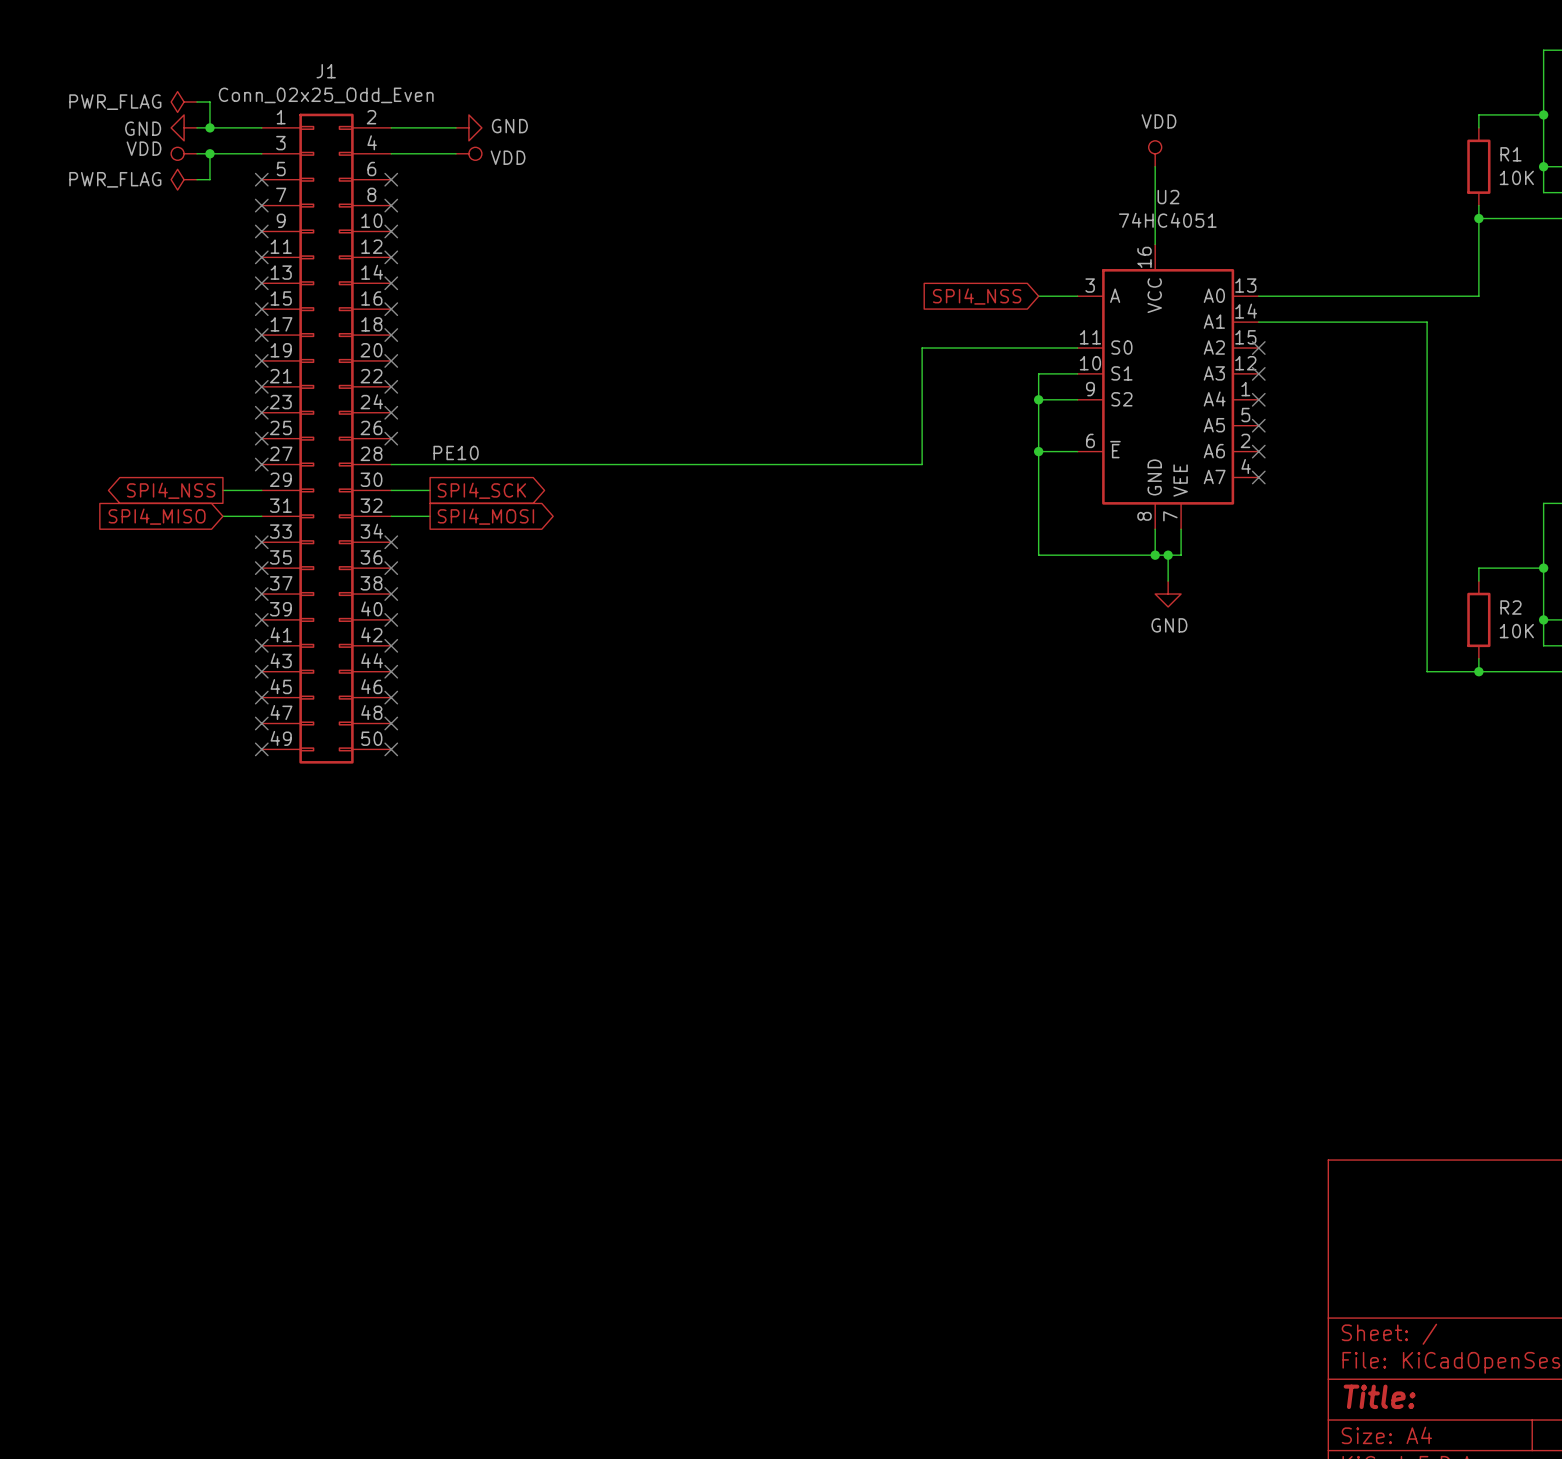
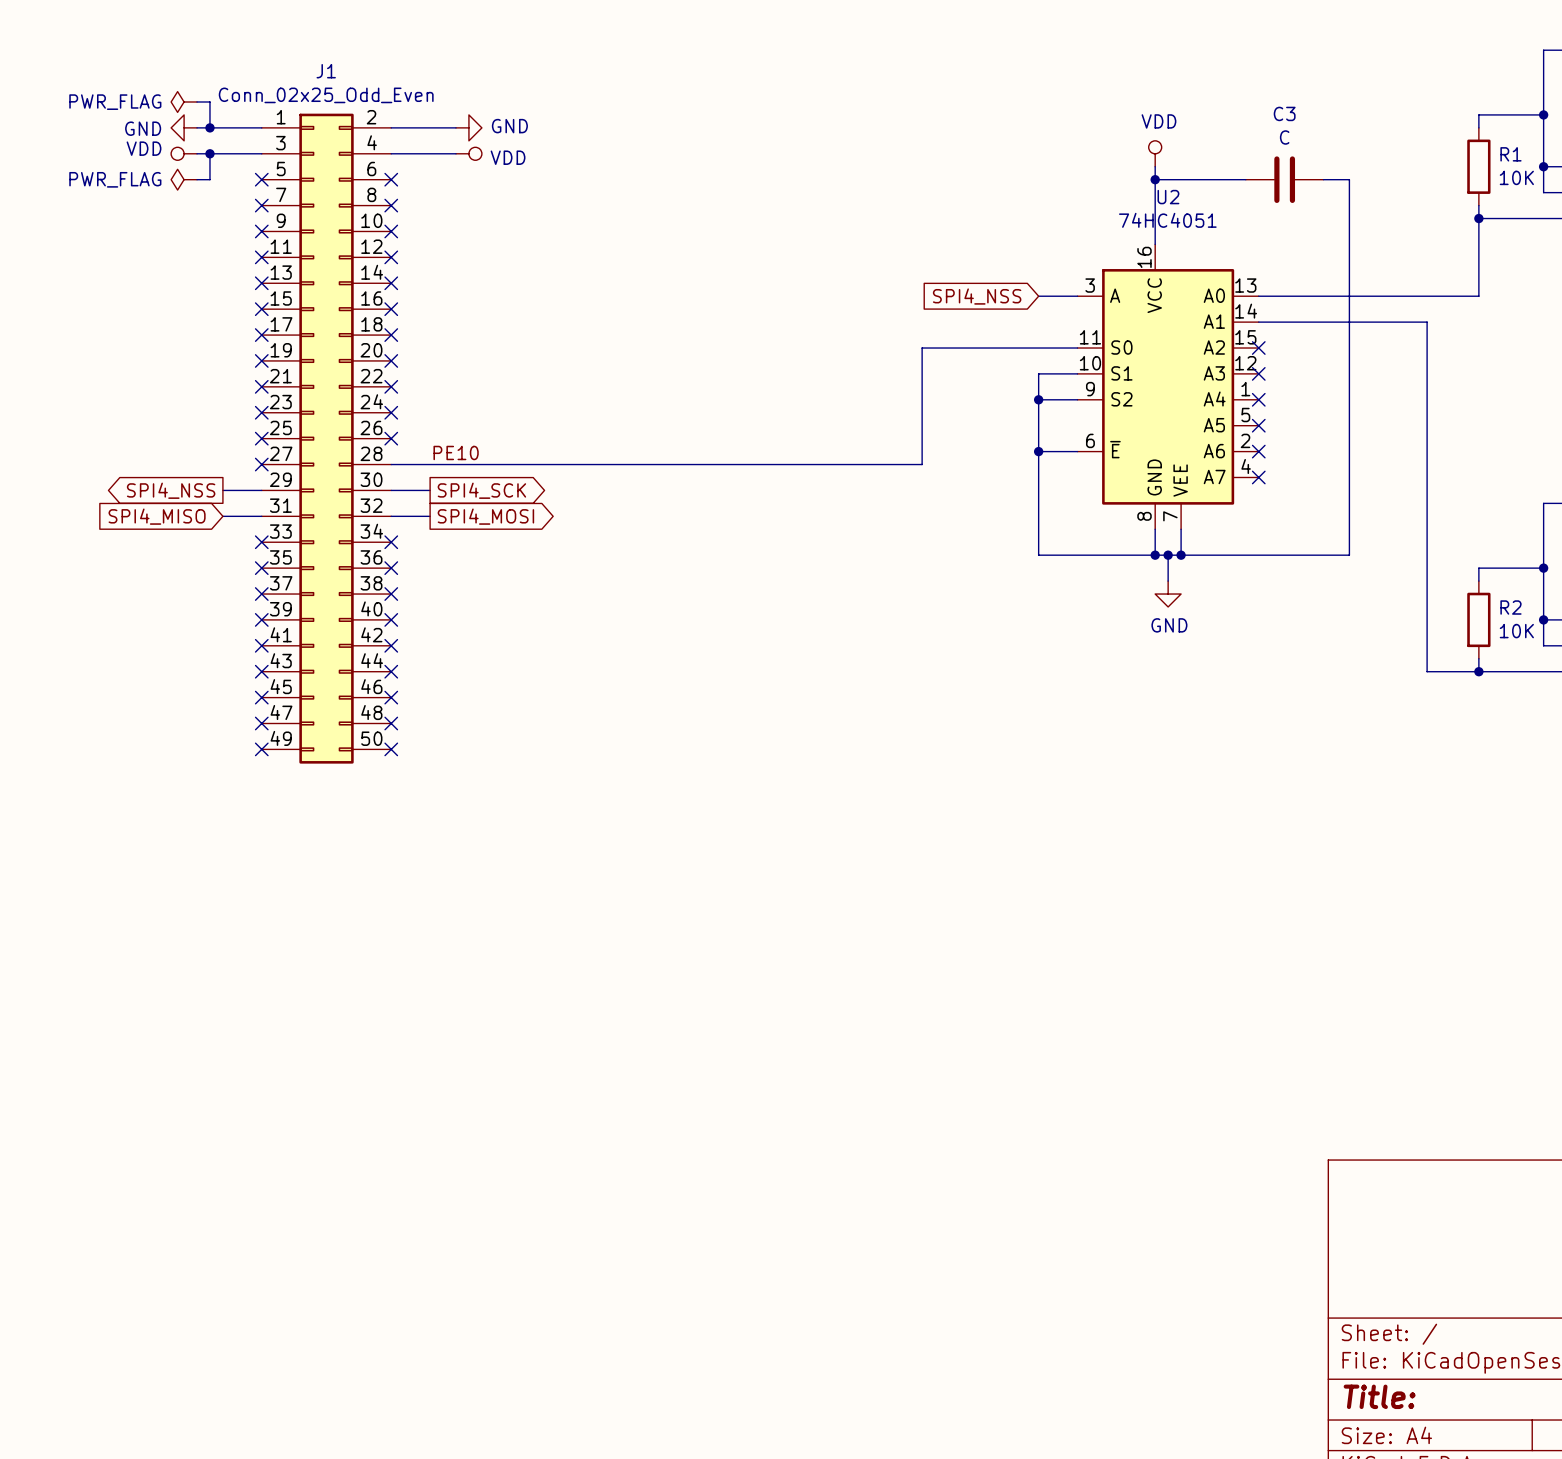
wire: none -> (1155, 179) (1245, 179)
junction: none -> (1155, 179)
C3: none -> C (1284, 179)
wire: none -> (1323, 179) (1349, 179) (1349, 555) (1181, 555)
junction: none -> (1181, 555)

